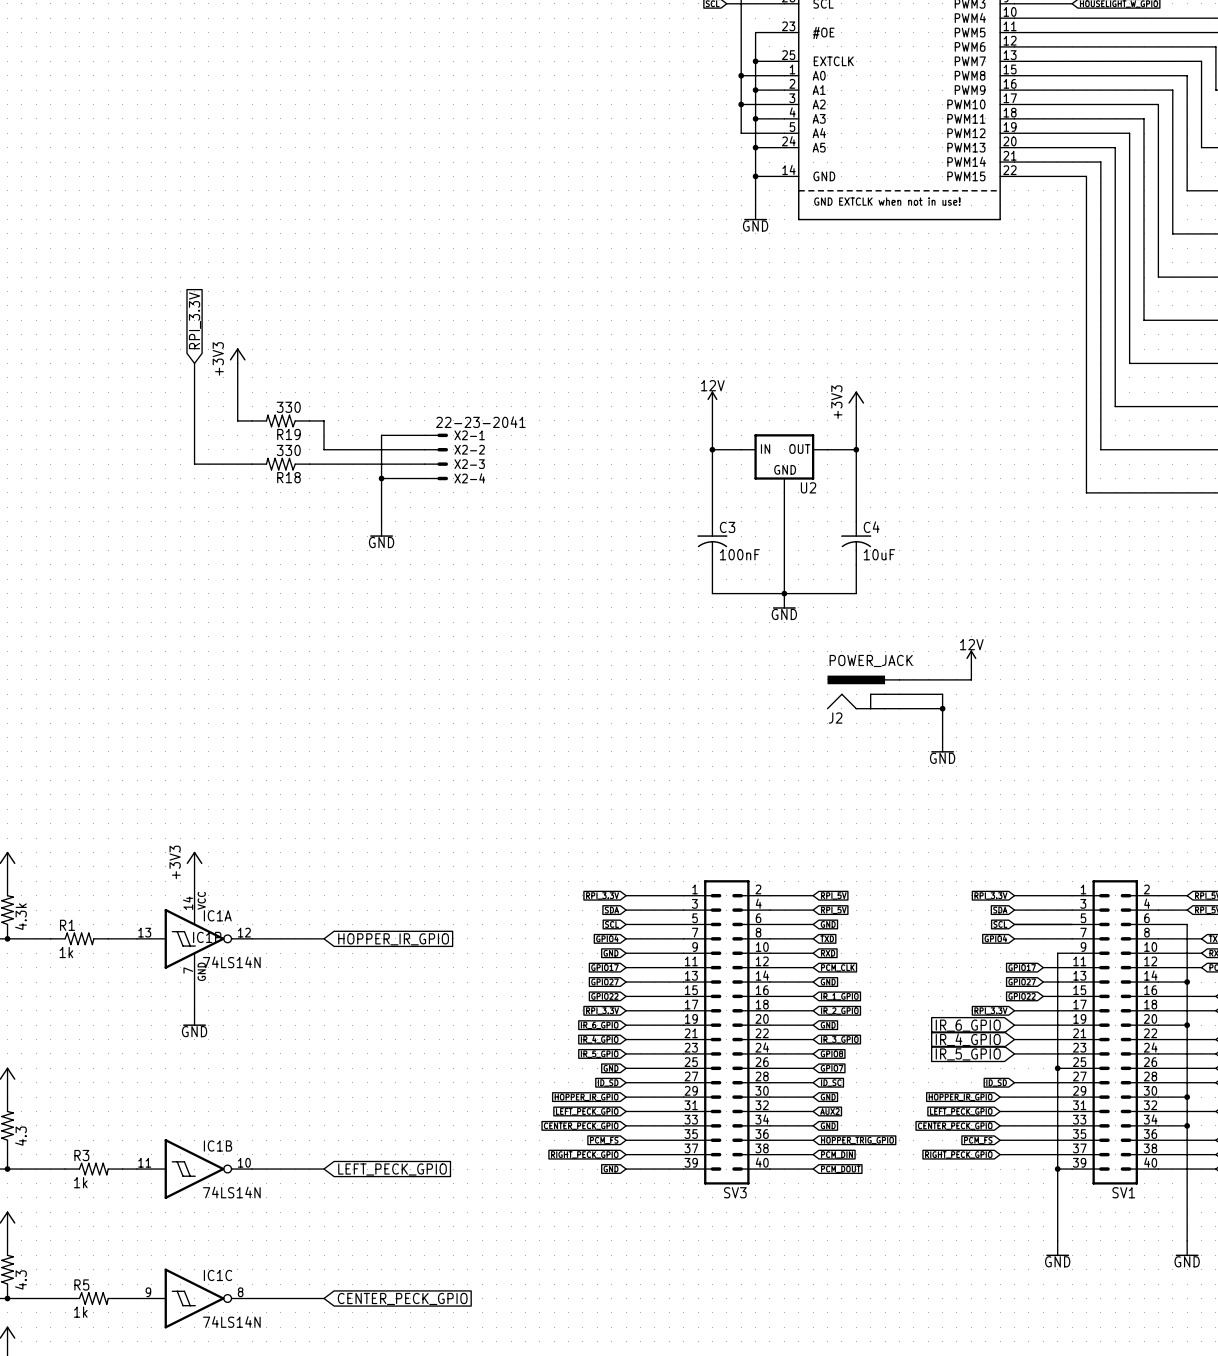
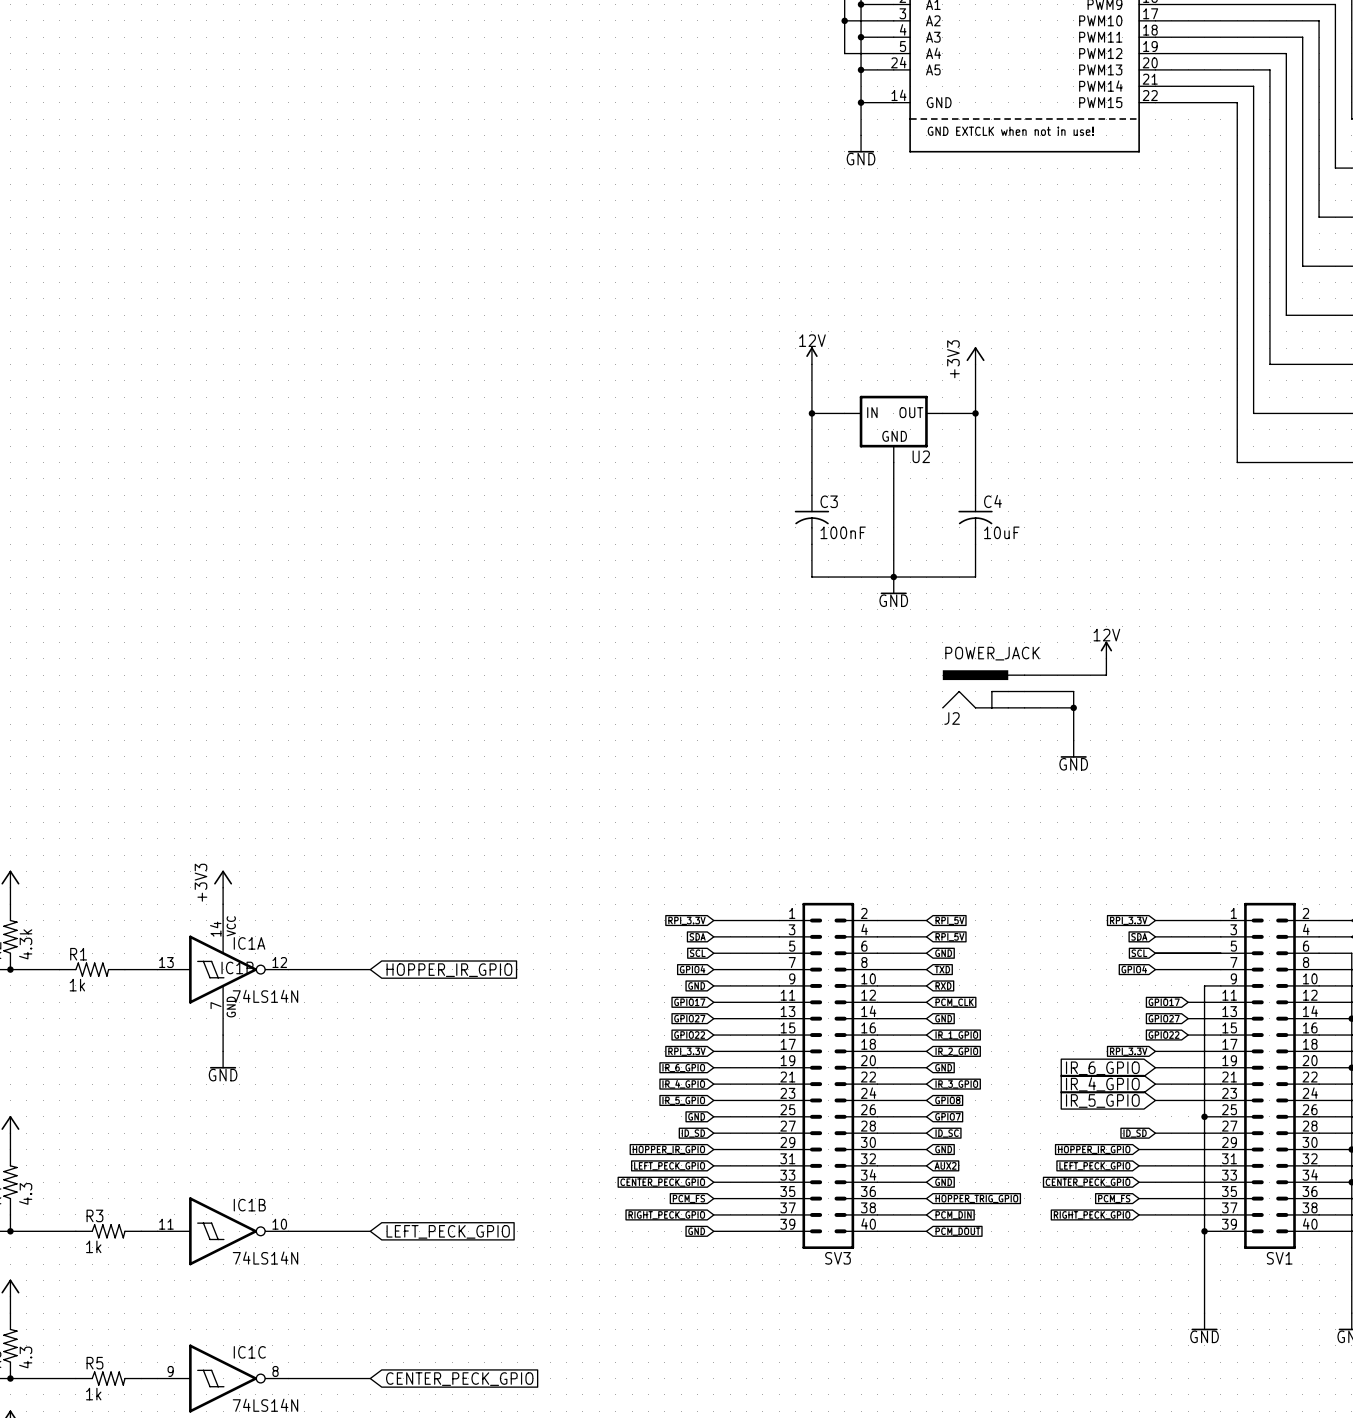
global label: RPI_3.3V (195, 320) -> none
power symbol: +3V3 (237, 355) -> none
wire: (194, 363) (194, 464) (252, 464) -> none
wire: (237, 363) (237, 420) (252, 420) -> none
R19: 330 (280, 420) -> none
wire: (309, 420) (324, 420) (324, 449) (424, 449) -> none
wire: (424, 435) (381, 435) (381, 521) -> none
X2-1: 22-23-2041 (436, 435) -> none
X2-2: (436, 449) -> none
R18: 330 (280, 464) -> none
wire: (309, 464) (424, 464) -> none
X2-3: (436, 464) -> none
wire: (381, 478) (424, 478) -> none
junction: (381, 478) -> none
X2-4: (436, 478) -> none
power symbol: GND (381, 529) -> none

